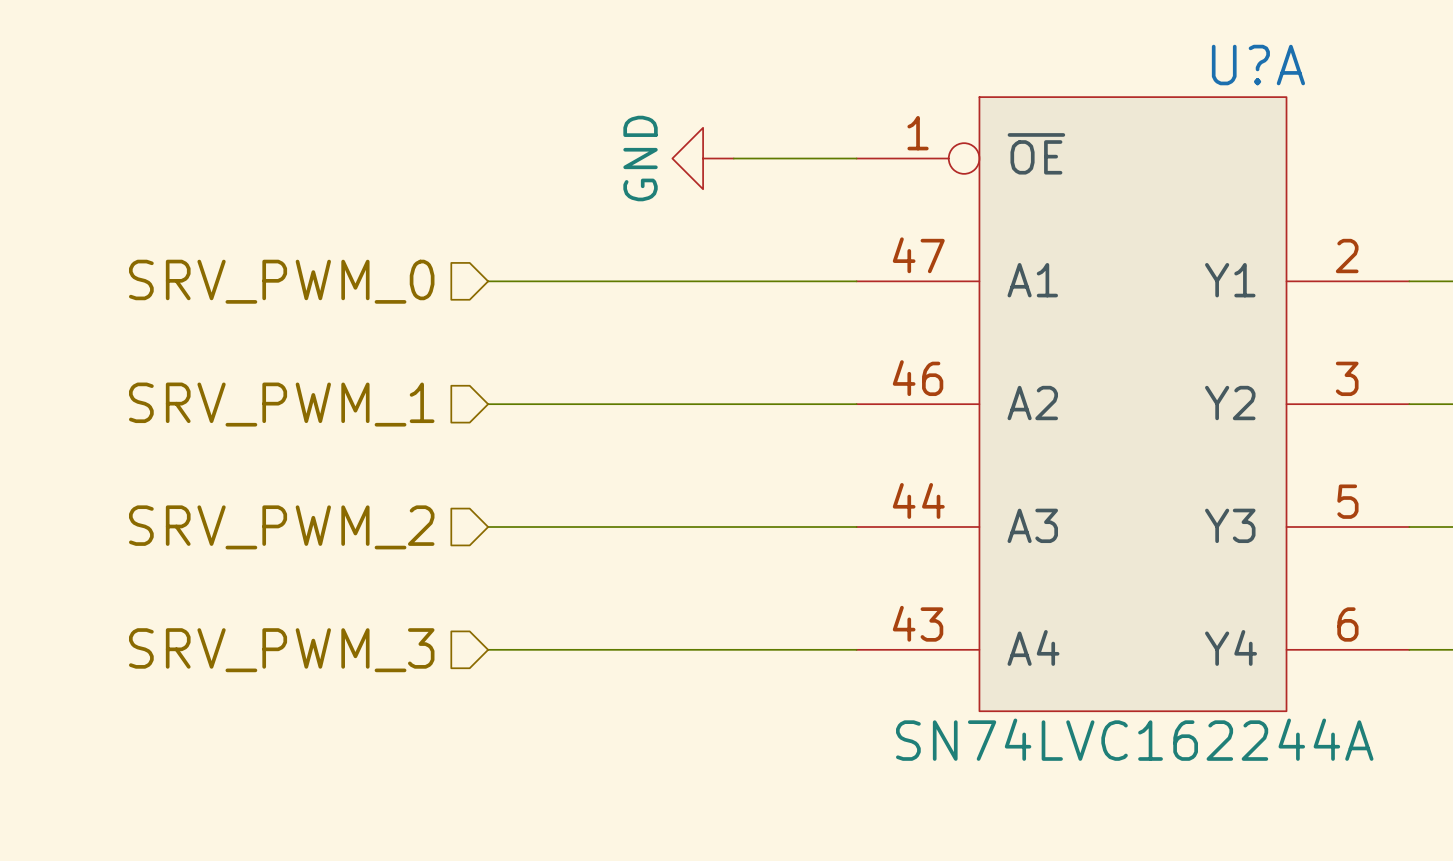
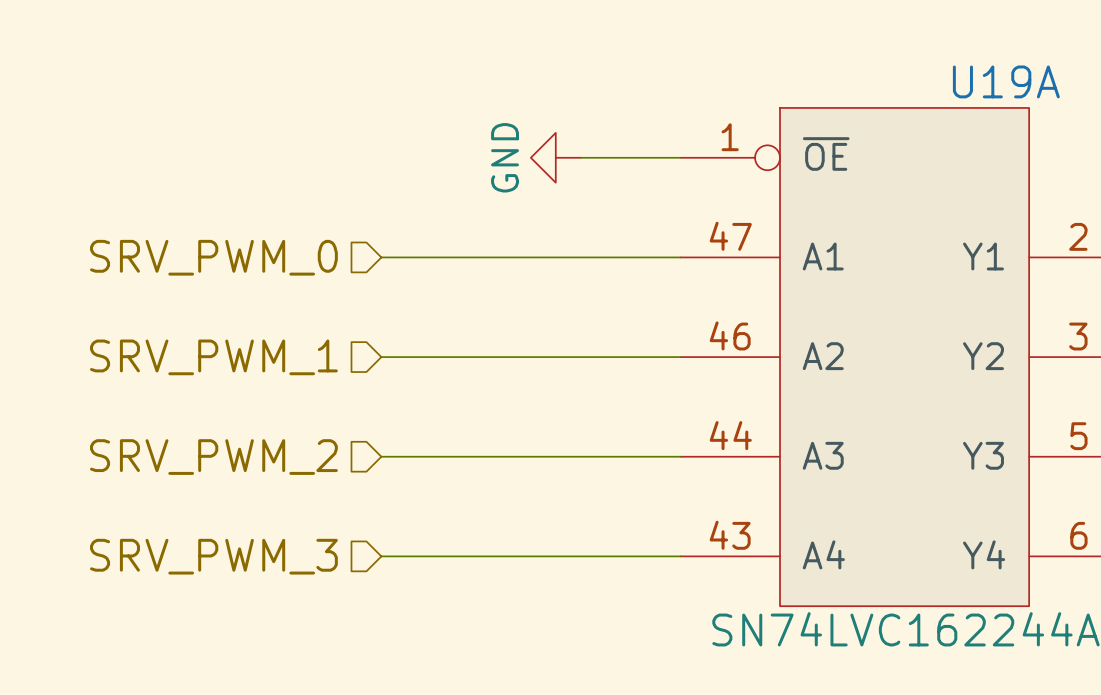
U?A name: U?A (1258, 65) -> U19A (1006, 81)

